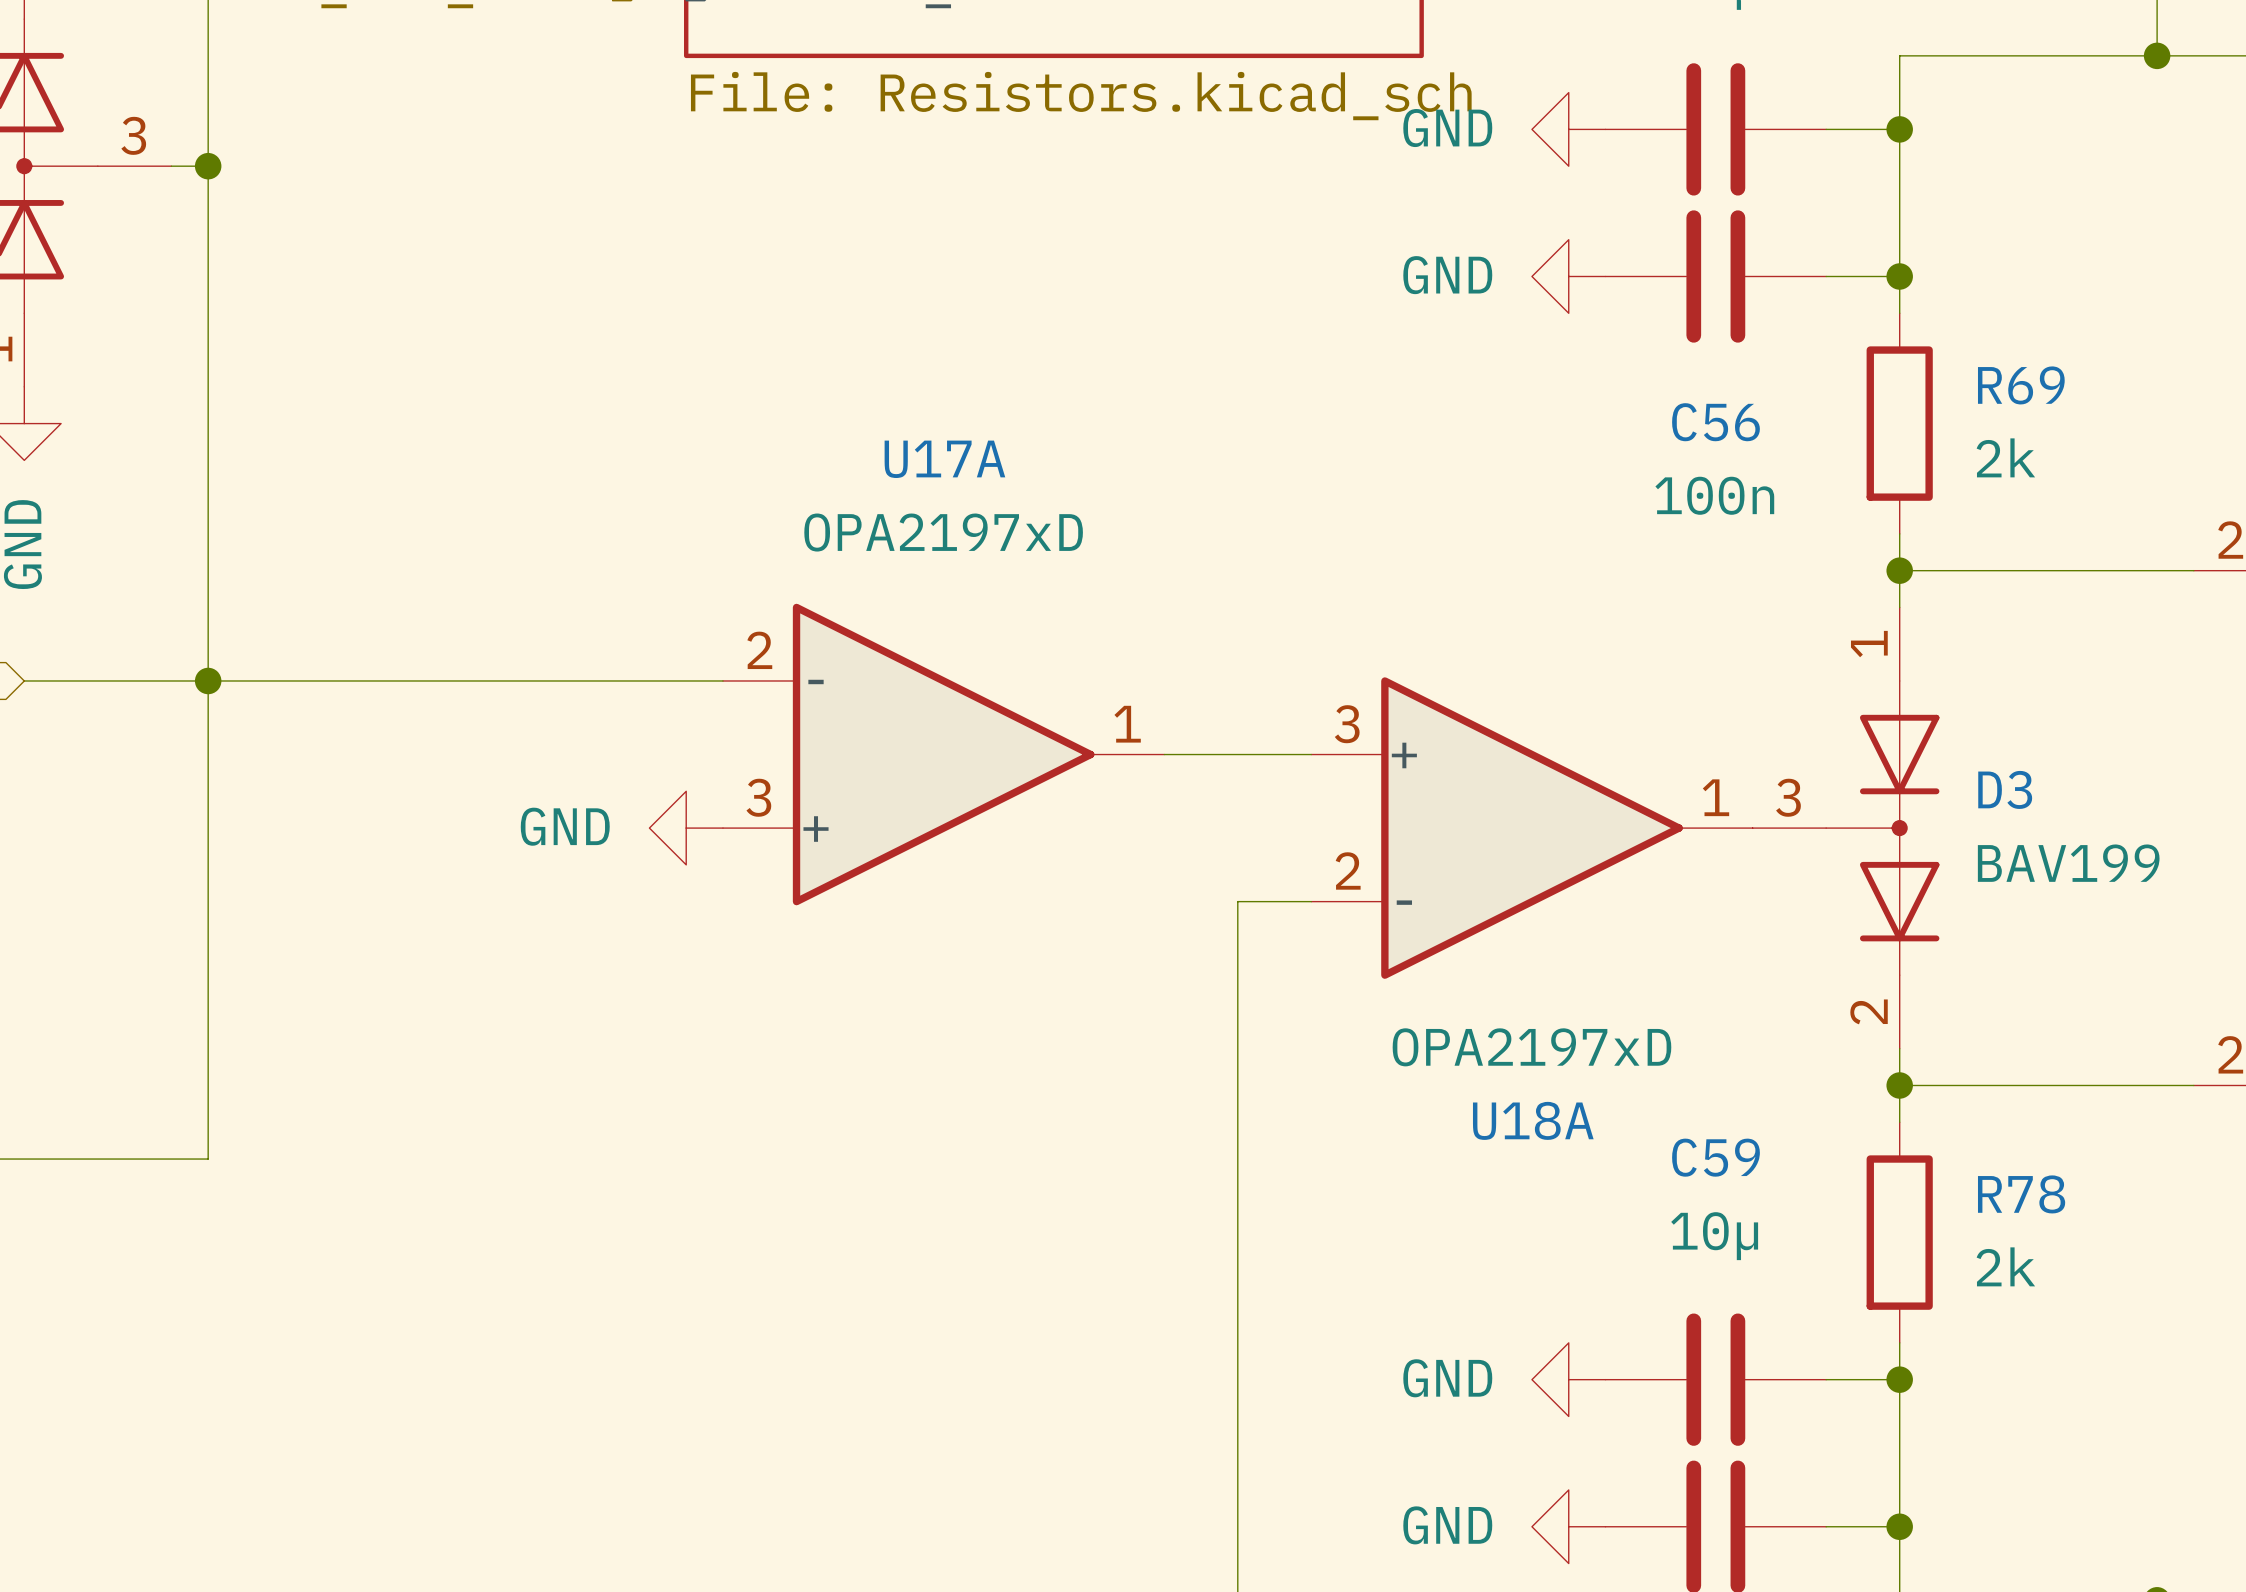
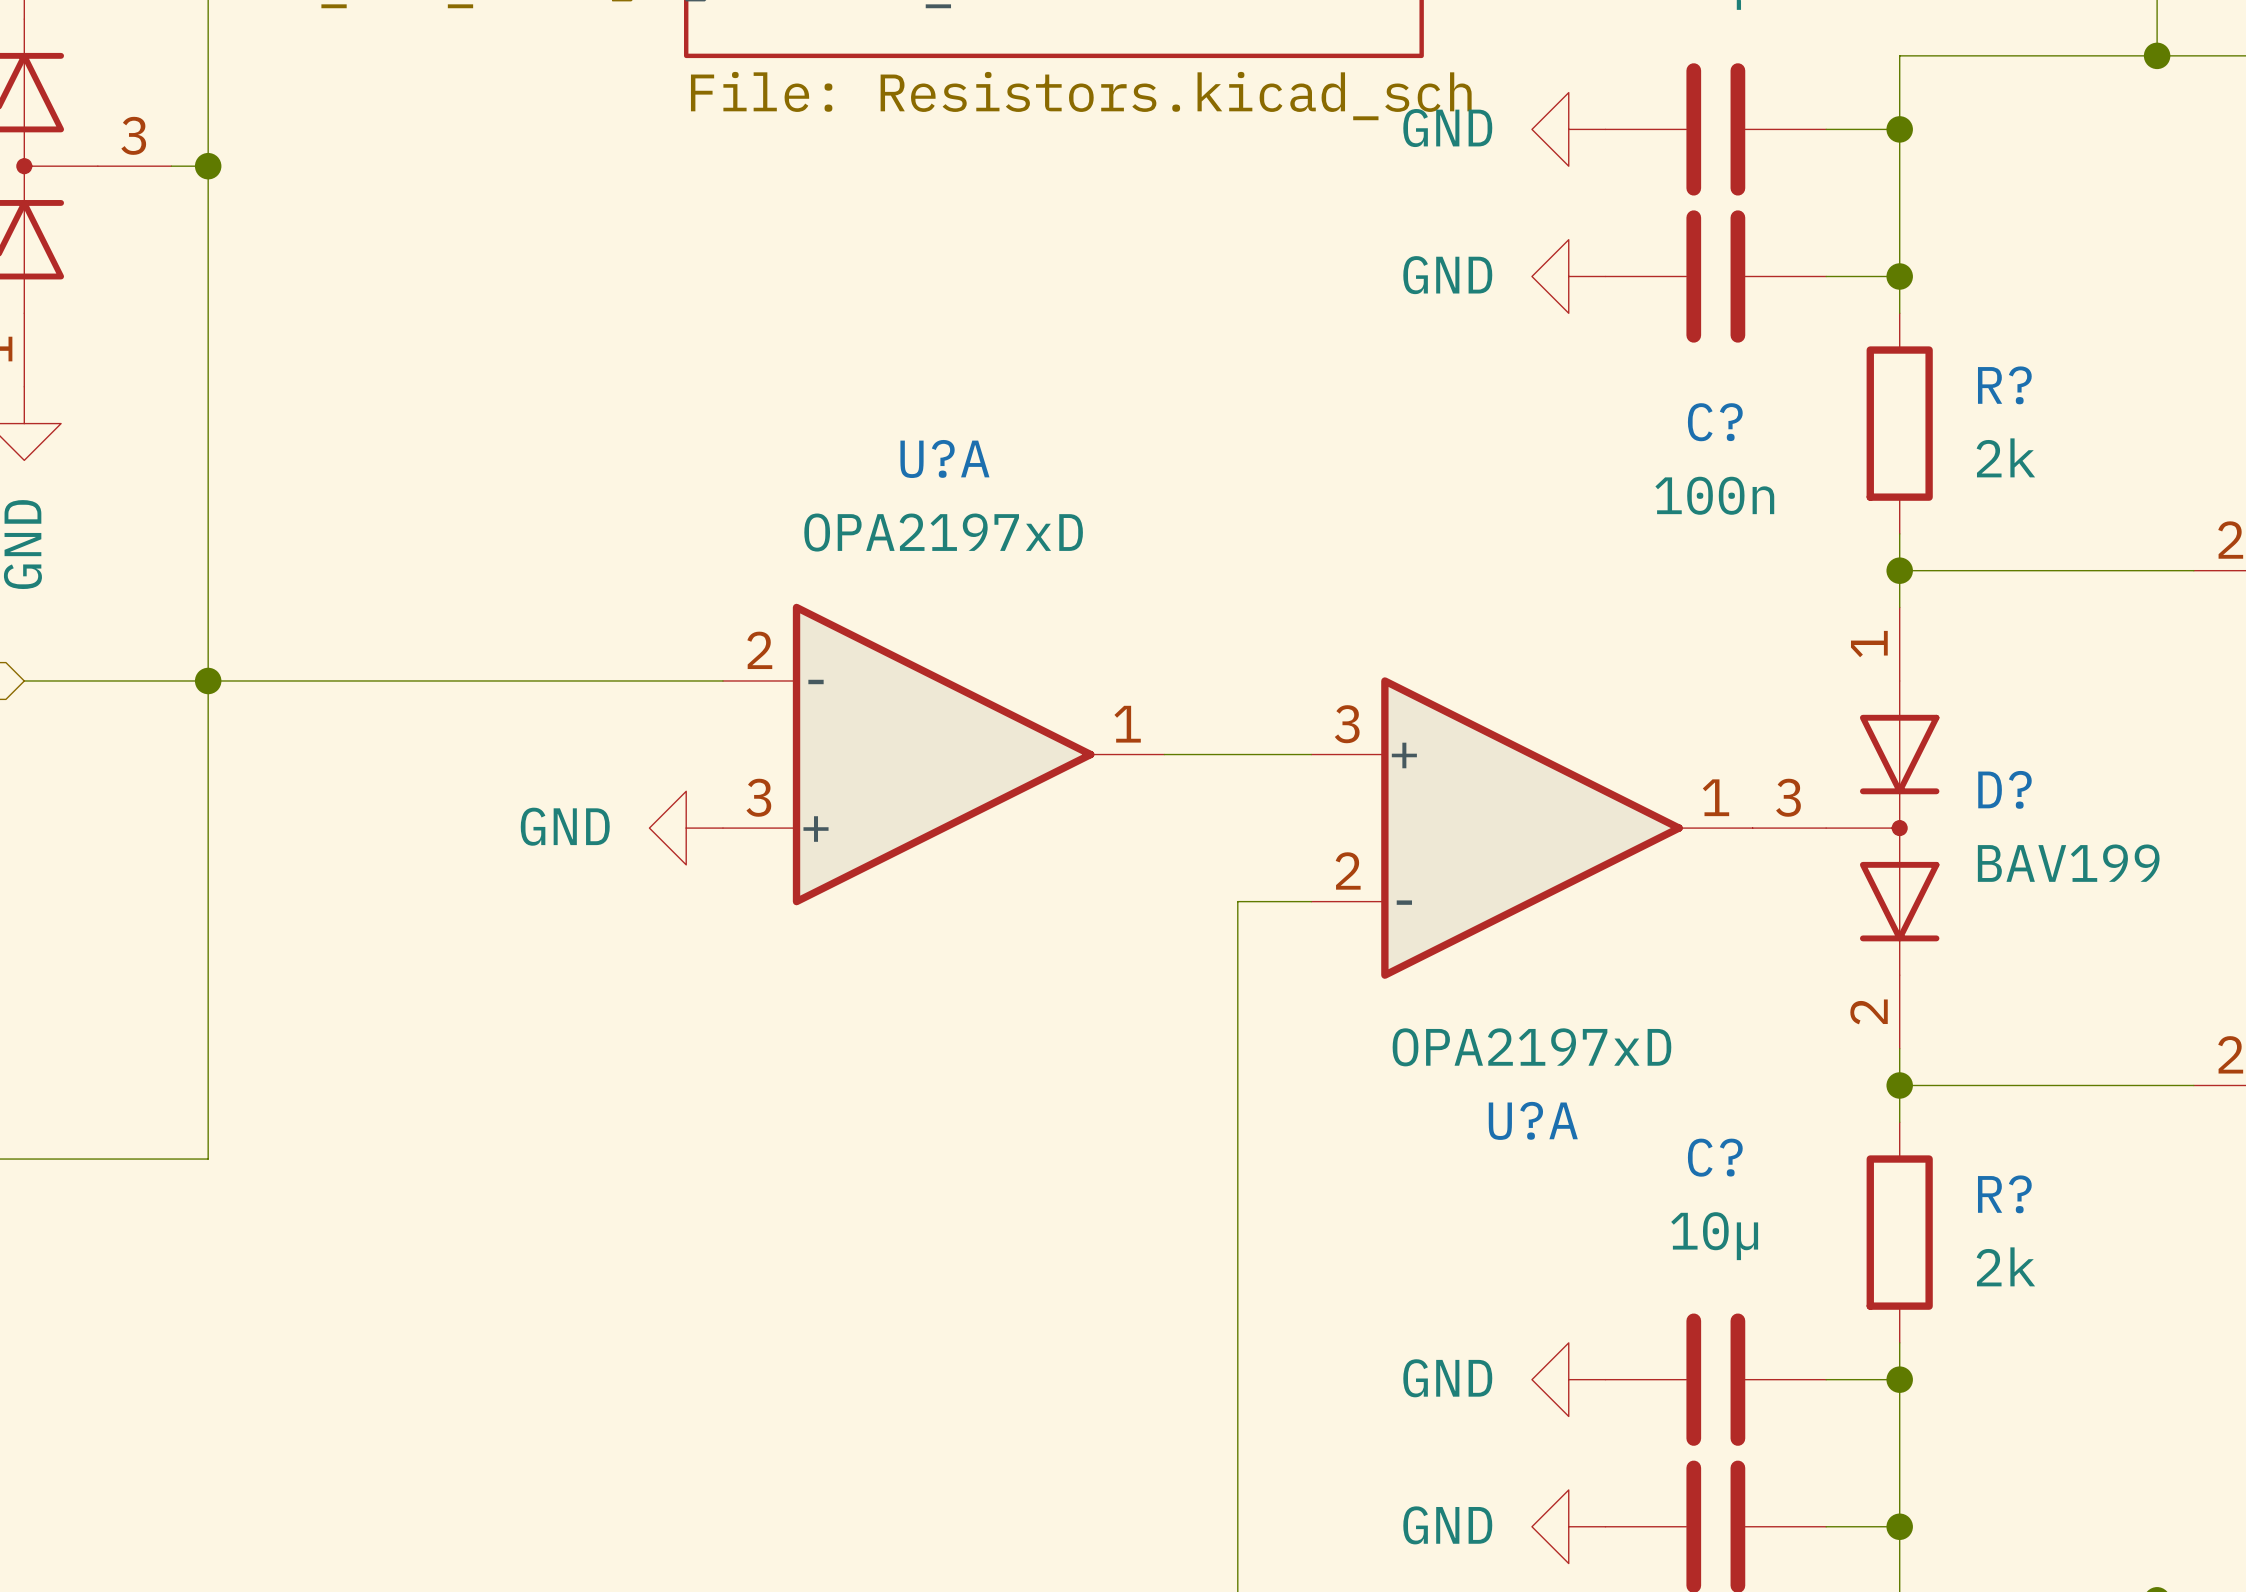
R69 name: R69 (2021, 385) -> R? (2004, 385)
C56 name: C56 (1715, 422) -> C? (1715, 422)
U17A name: U17A (944, 459) -> U?A (944, 458)
D3 name: D3 (2005, 789) -> D? (2004, 789)
U18A name: U18A (1533, 1120) -> U?A (1533, 1120)
C59 name: C59 (1715, 1157) -> C? (1715, 1157)
R78 name: R78 (2021, 1194) -> R? (2004, 1194)

